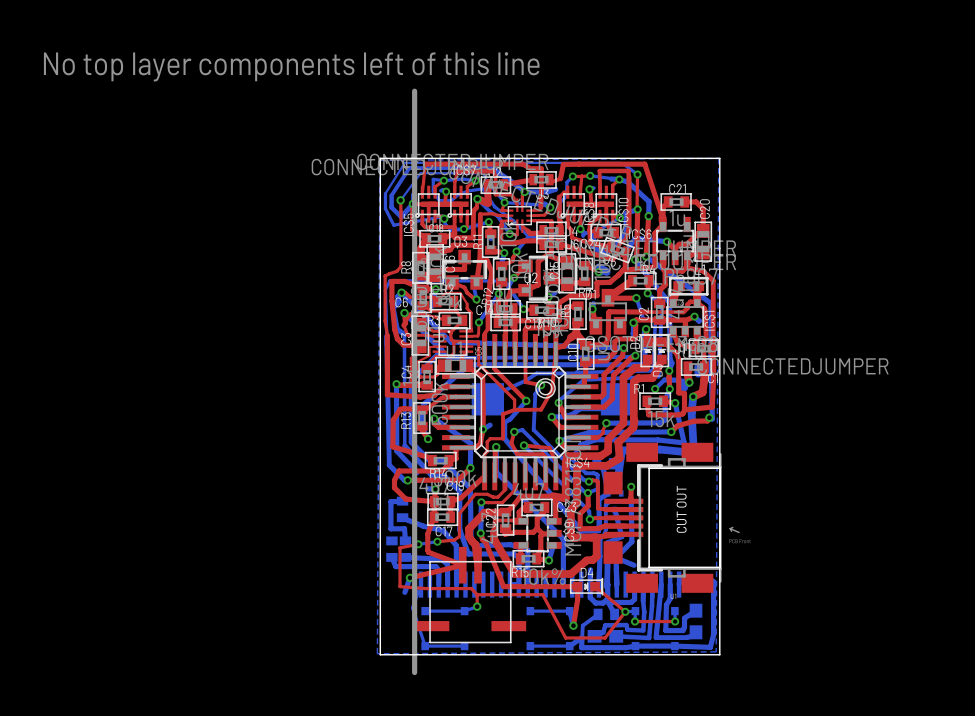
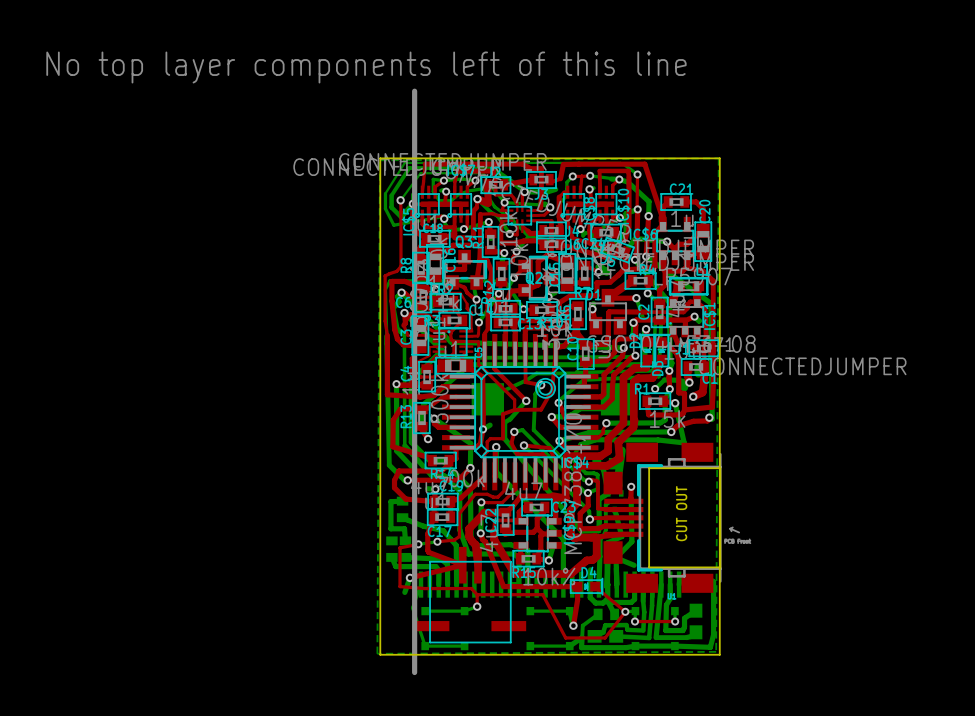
bottom track: (693, 396) (691, 412) (693, 452) (659, 449) (621, 450) -> none

